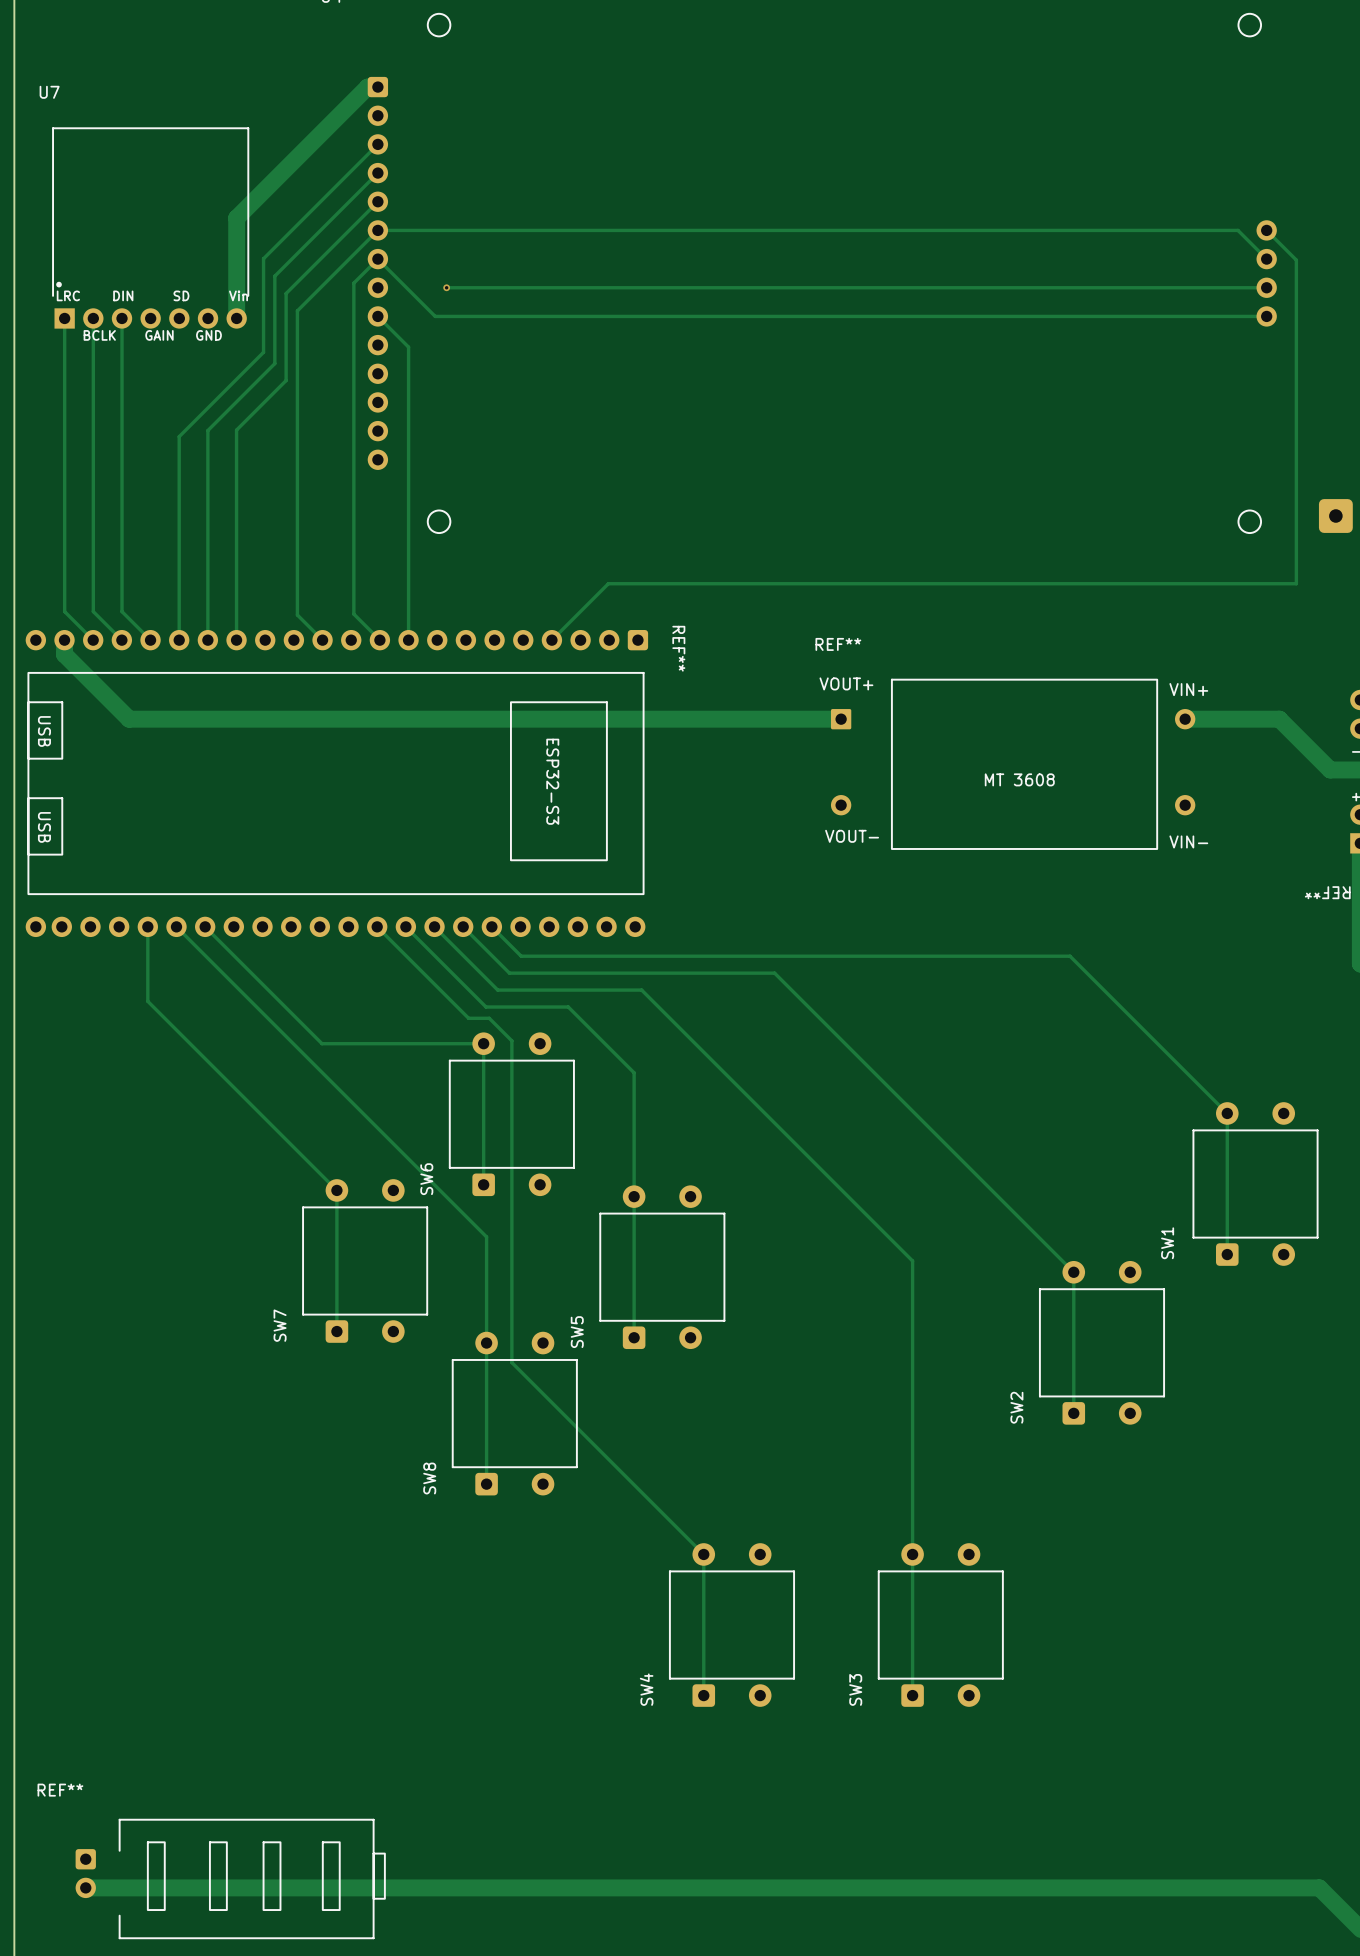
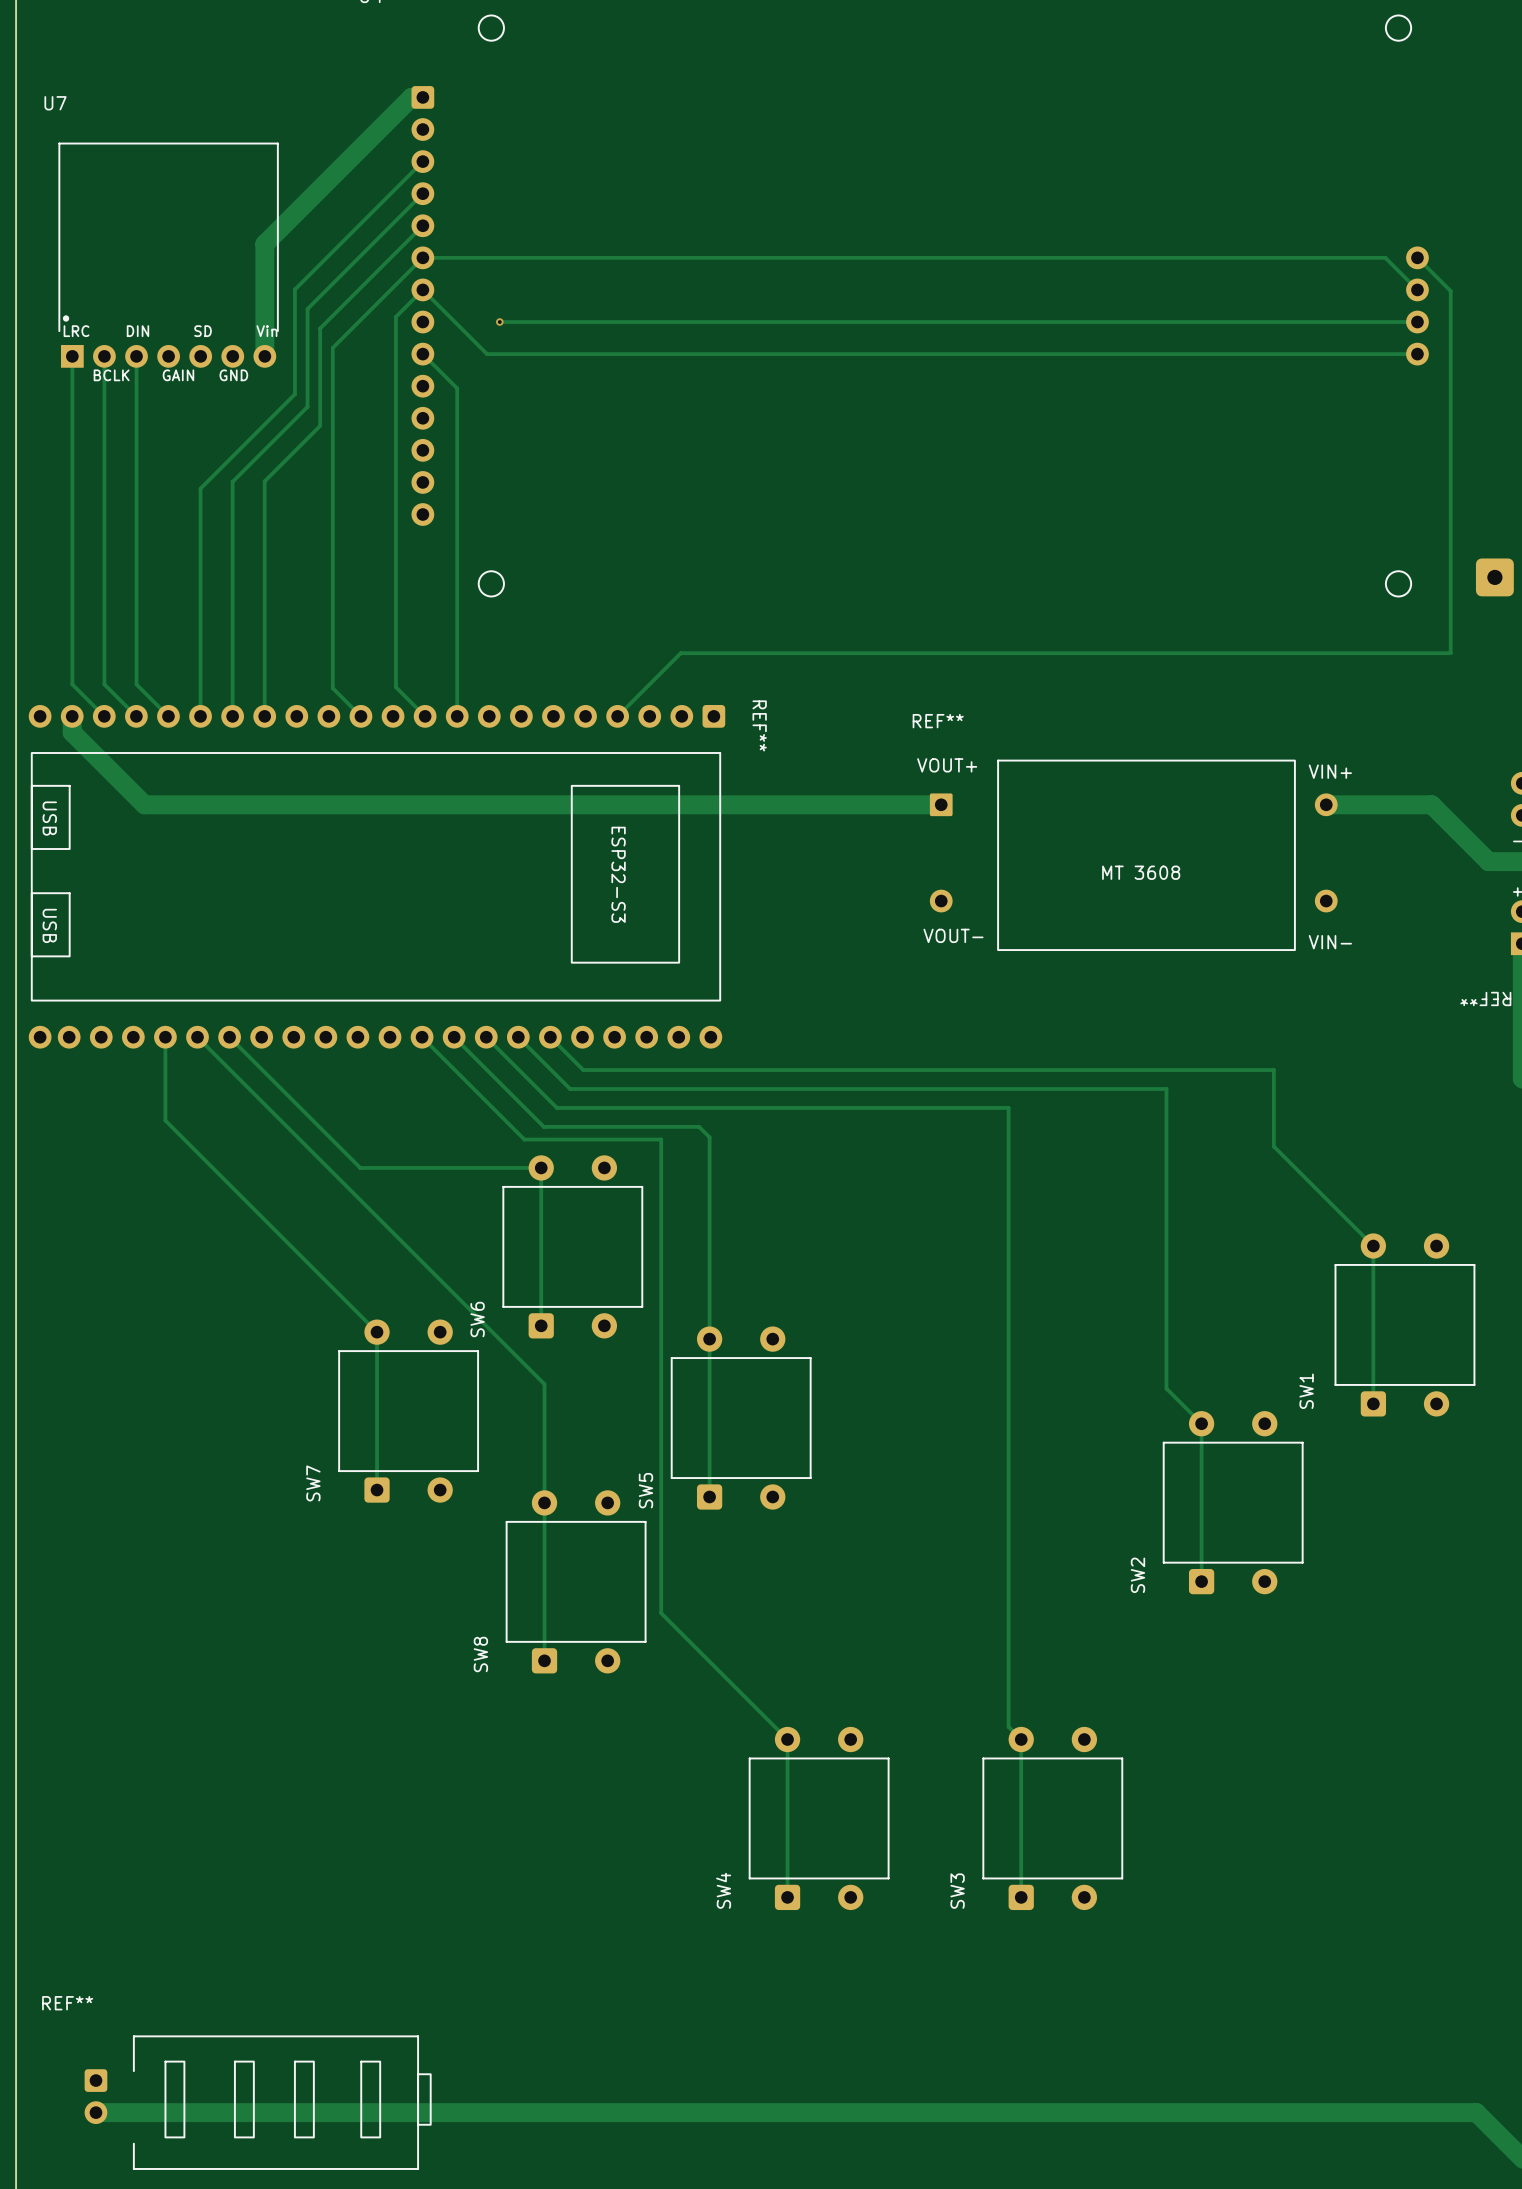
track: (1070, 956) (1138, 1024) -> (1197, 1070) (1273, 1070) (1273, 1146)
track: (774, 973) (1042, 1240) -> (866, 1088) (1166, 1088) (1166, 1388)
track: (641, 990) (912, 1260) (912, 1554) -> (718, 1107) (1008, 1107) (1008, 1726) (1021, 1739)
track: (568, 1007) (634, 1072) -> (635, 1126) (699, 1126) (709, 1137) (709, 1200)
track: (489, 1018) (511, 1040) (511, 1362) (590, 1441) -> (547, 1139) (661, 1139) (661, 1613)

